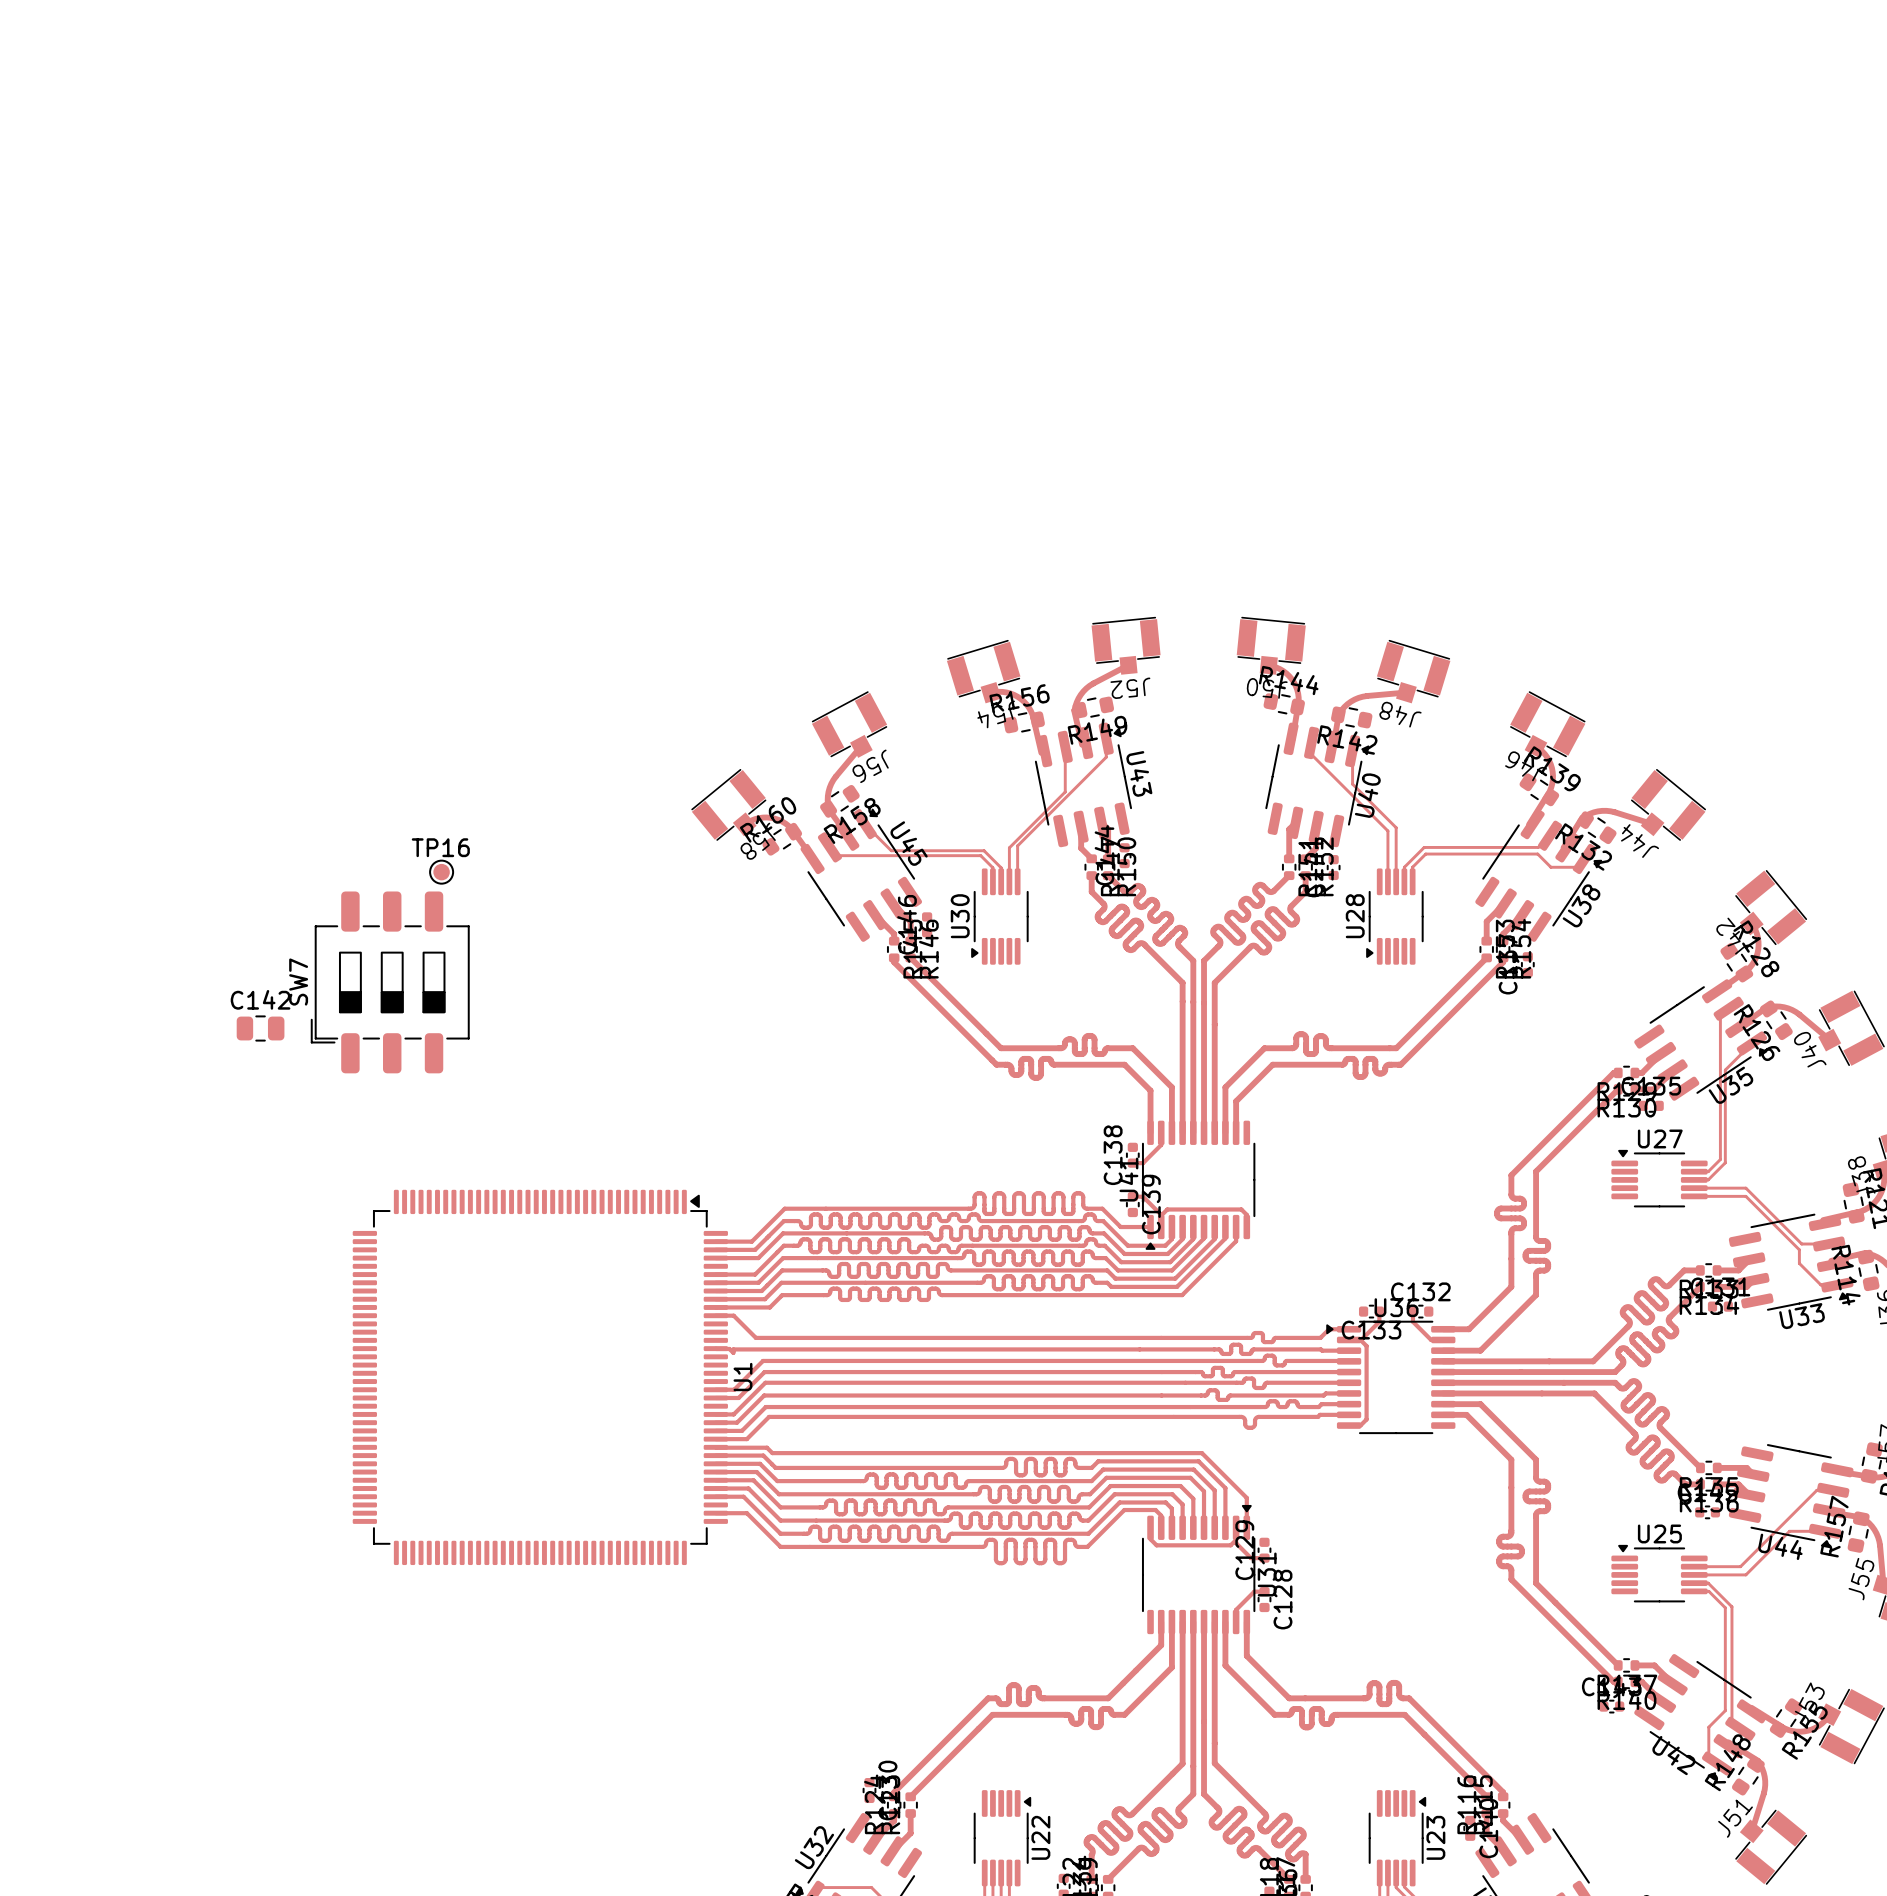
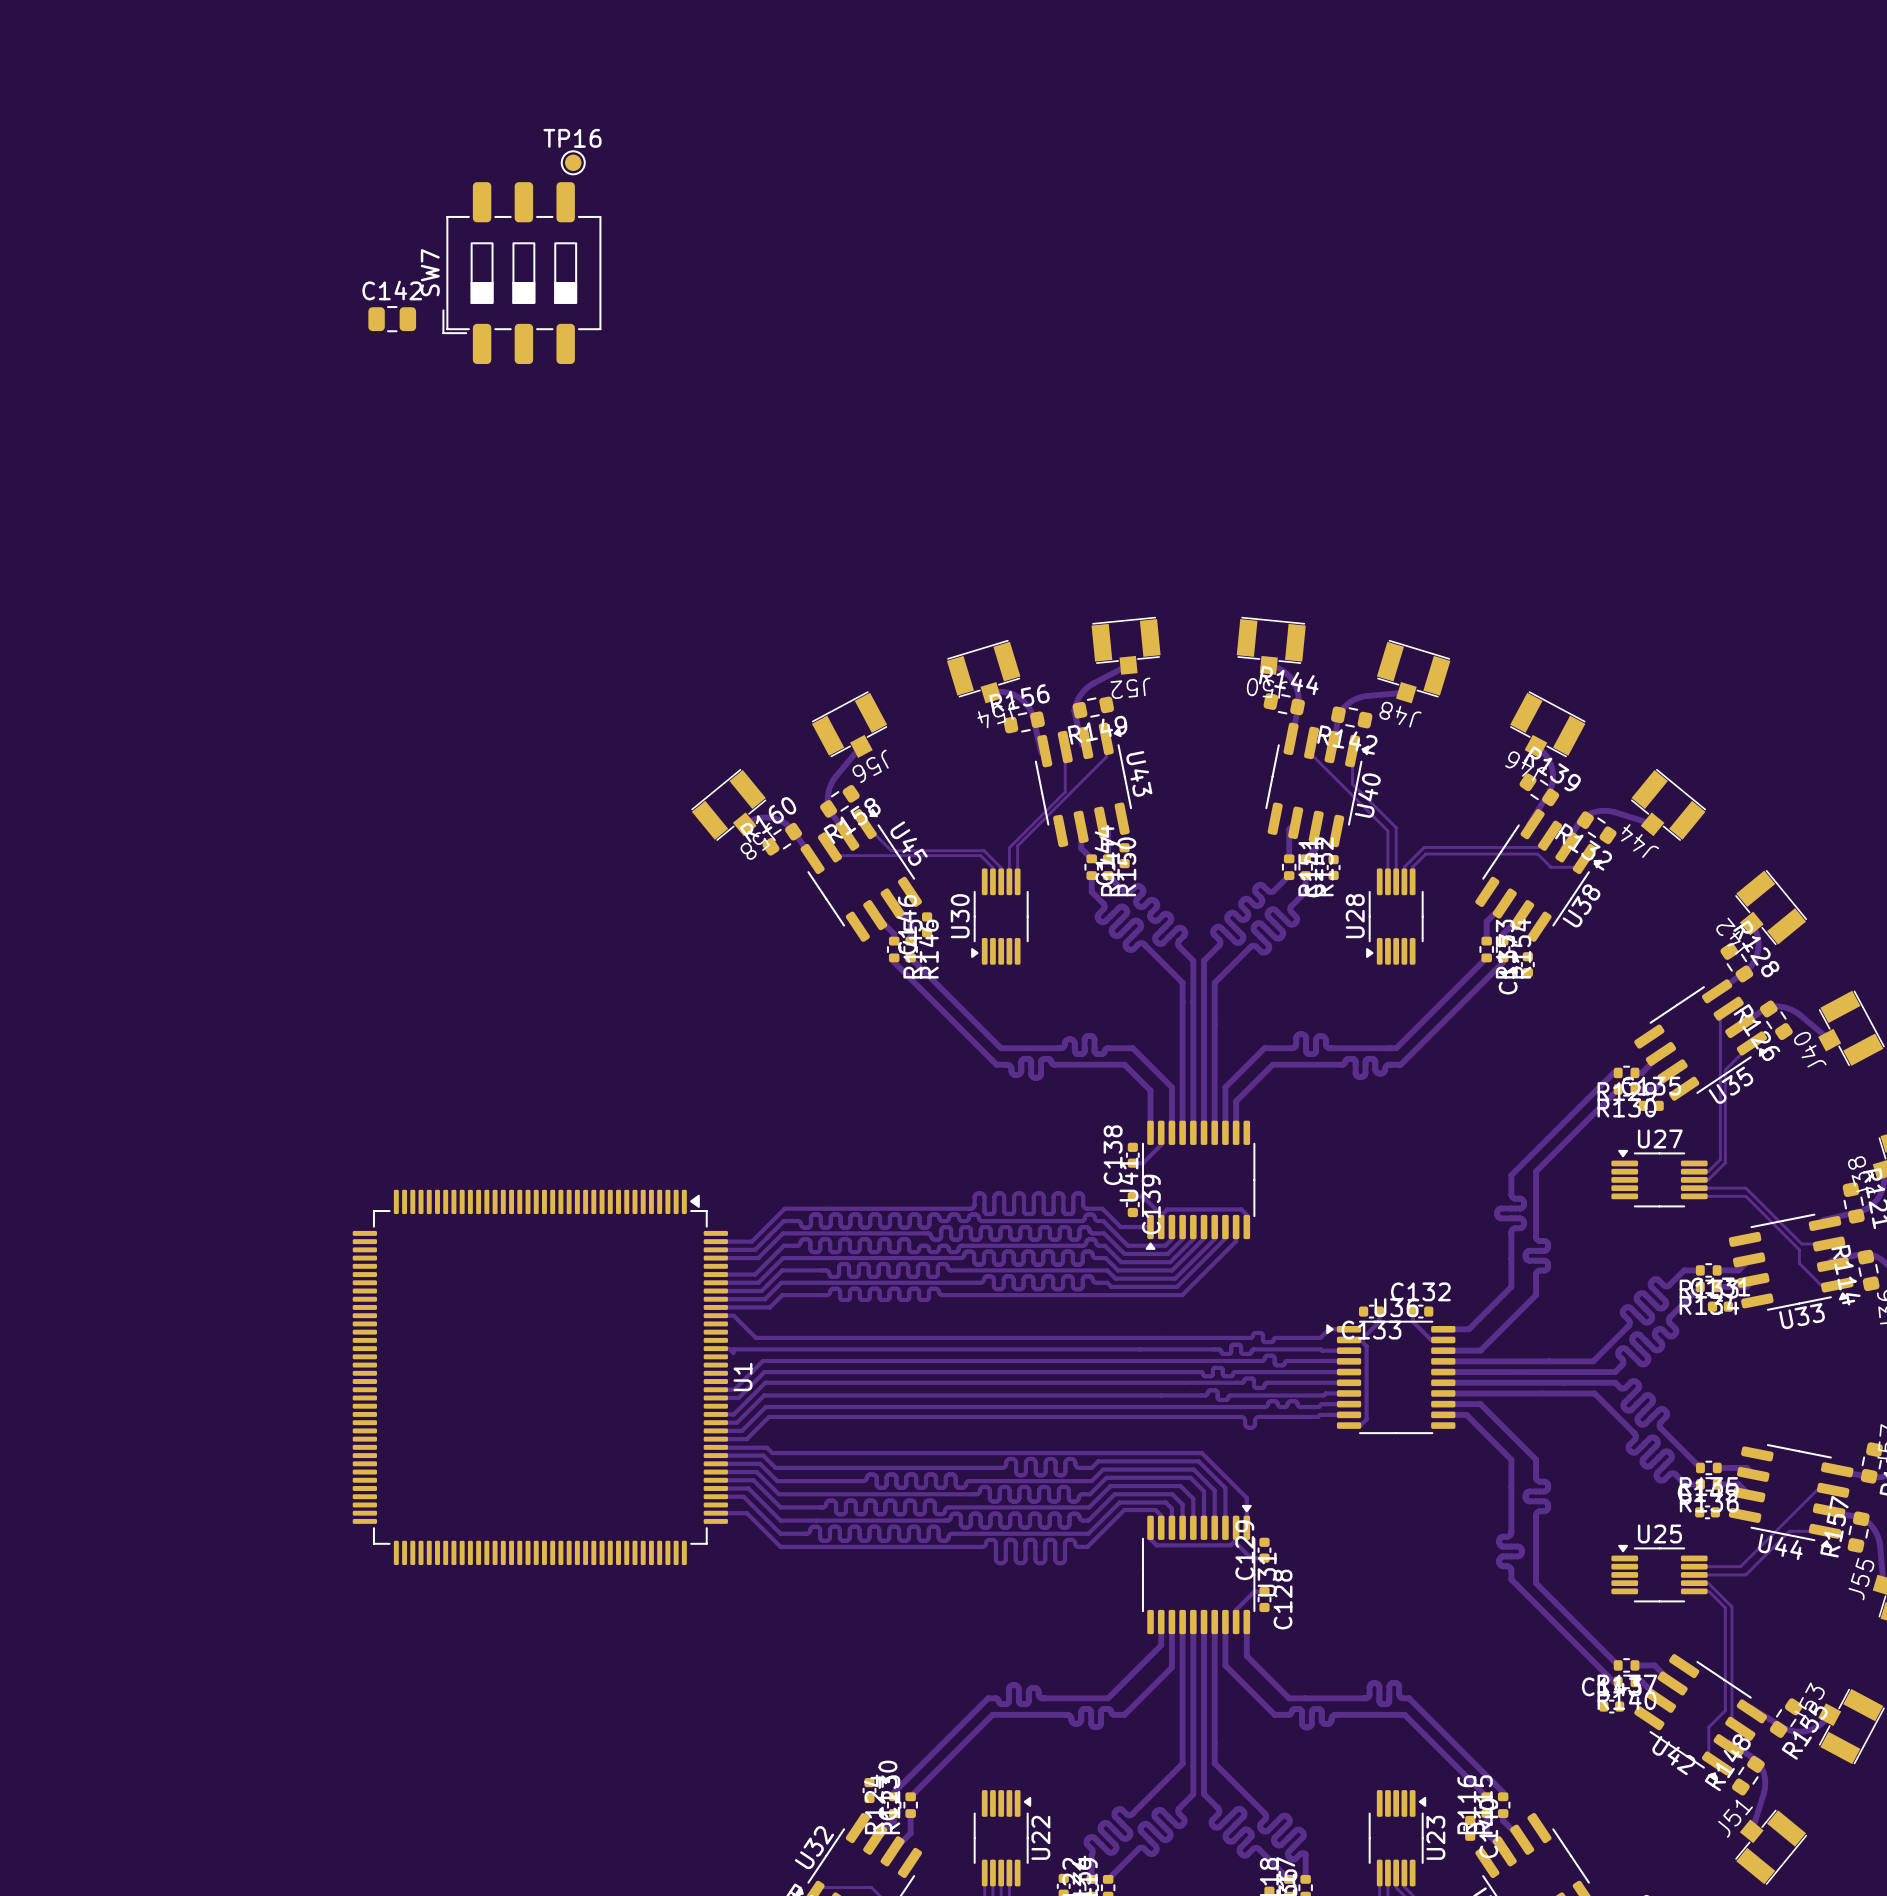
TP16 position: (441, 872) -> (573, 162)
SW7 position: (390, 982) -> (521, 273)
C142 position: (260, 1028) -> (392, 319)

